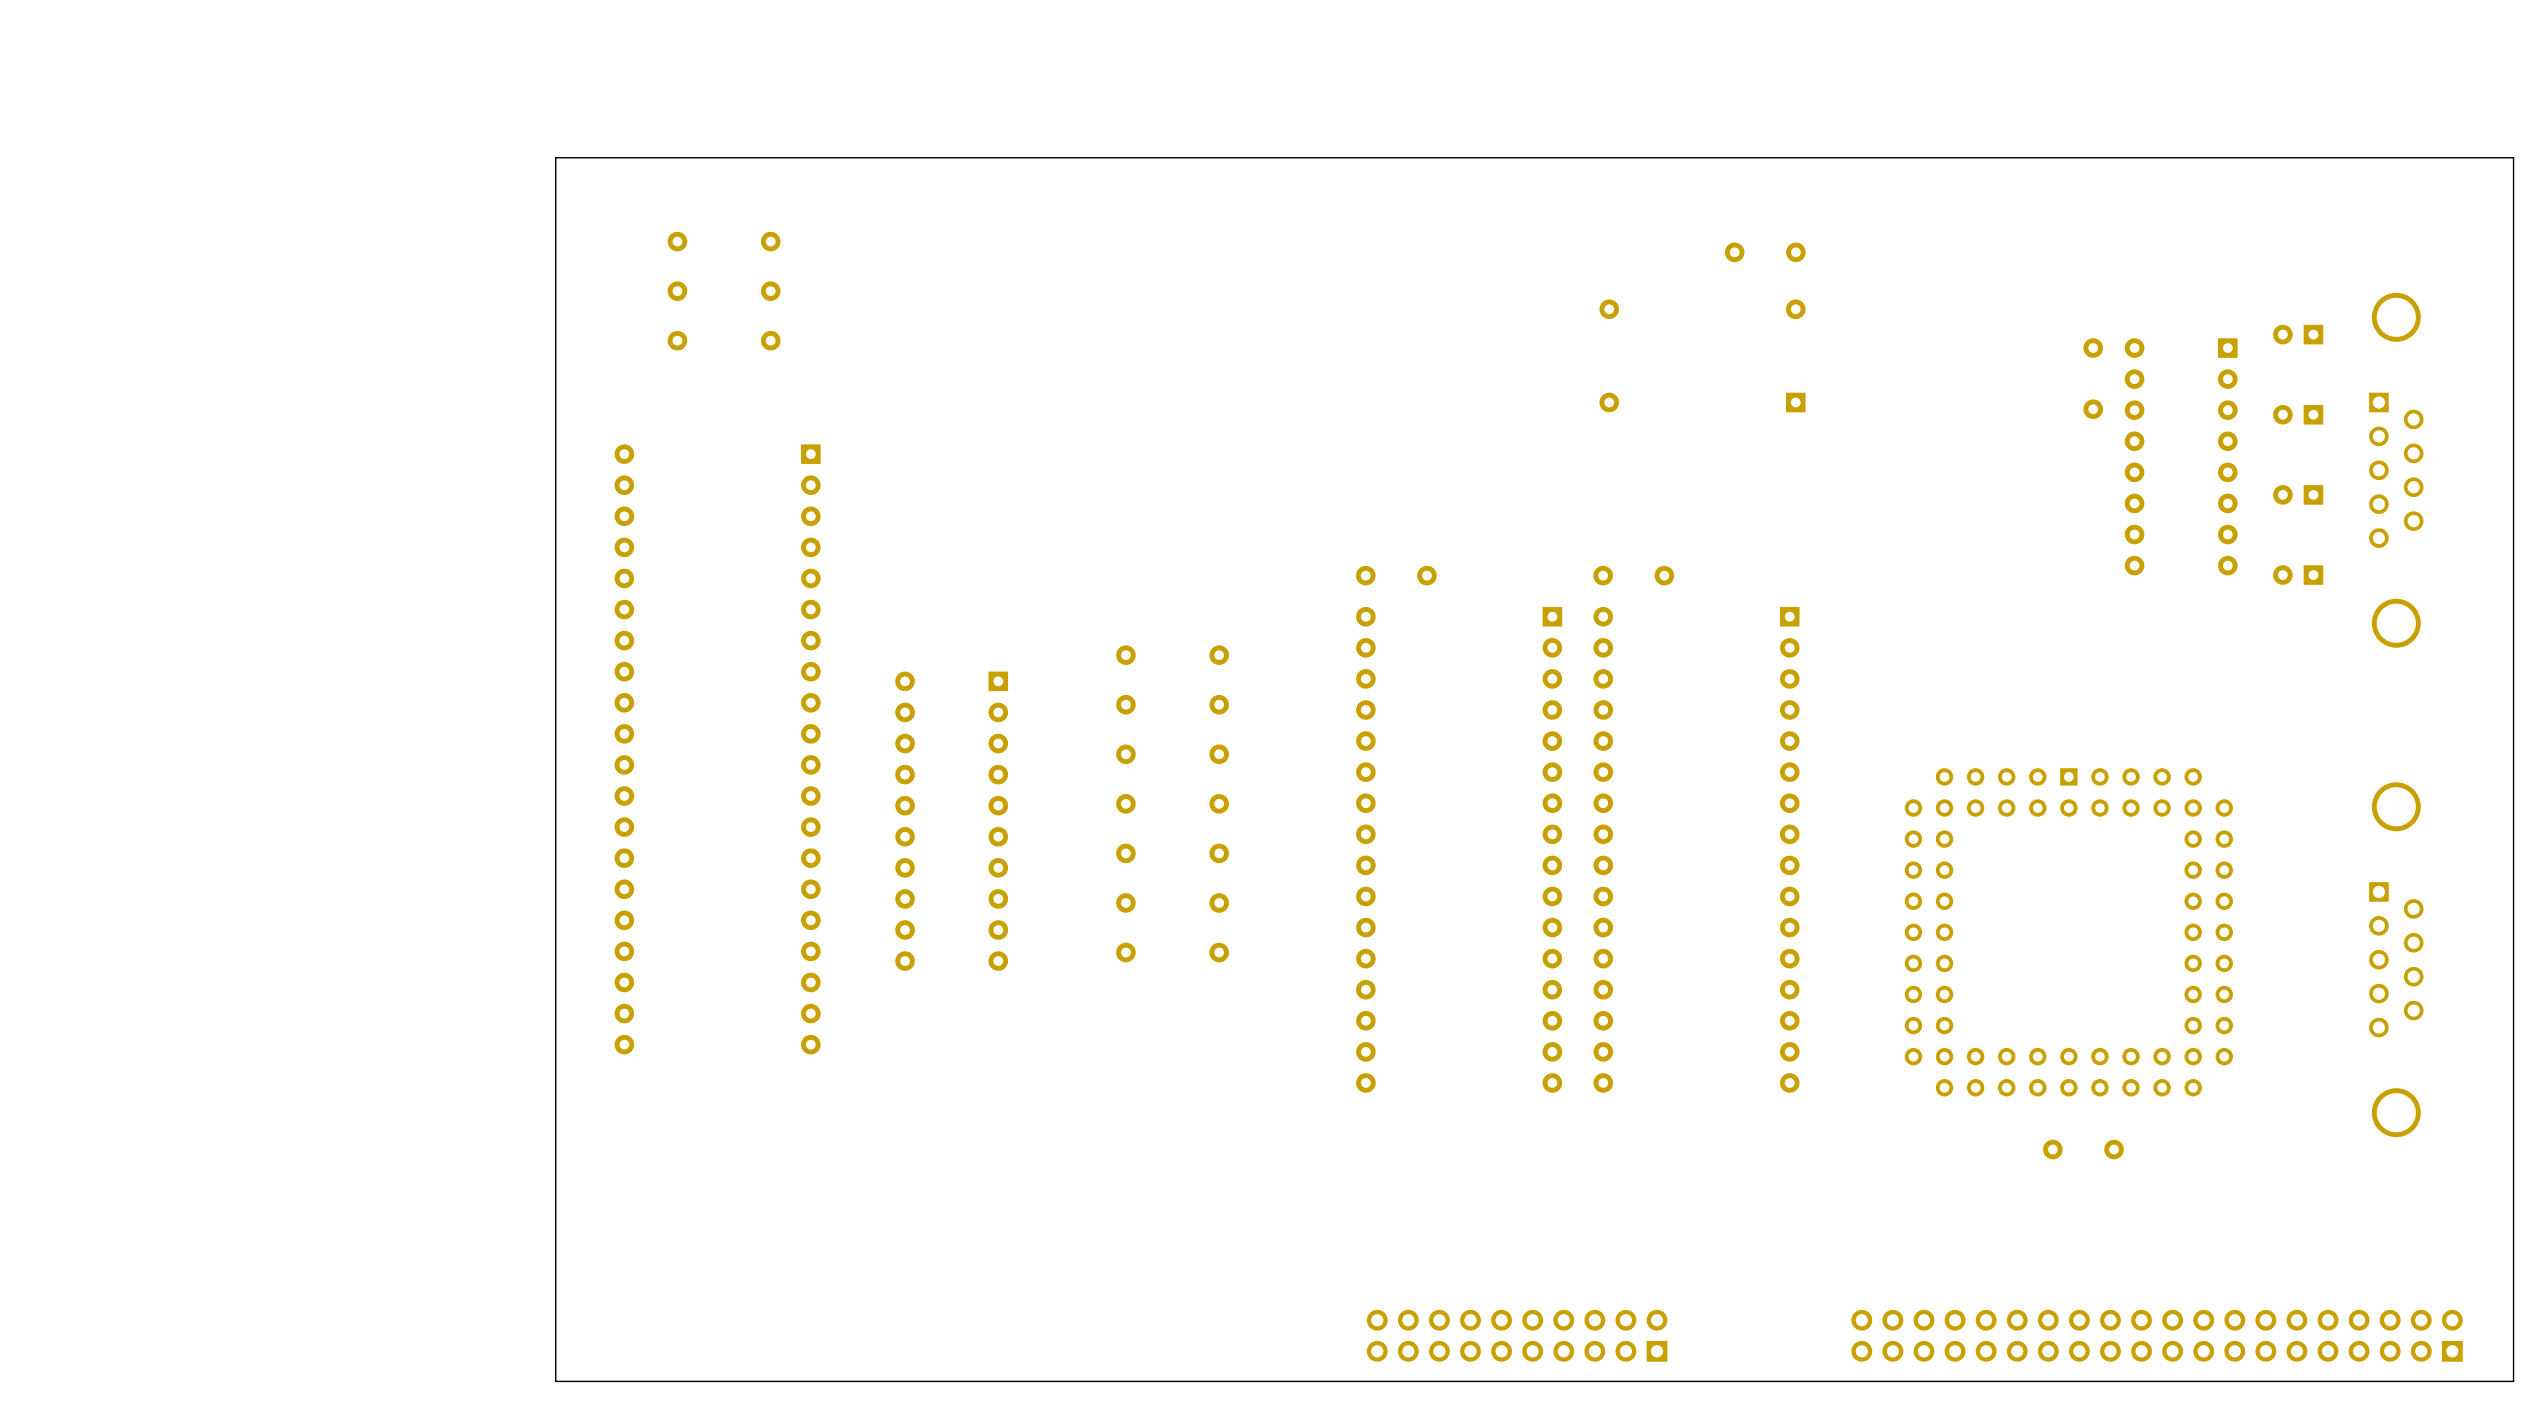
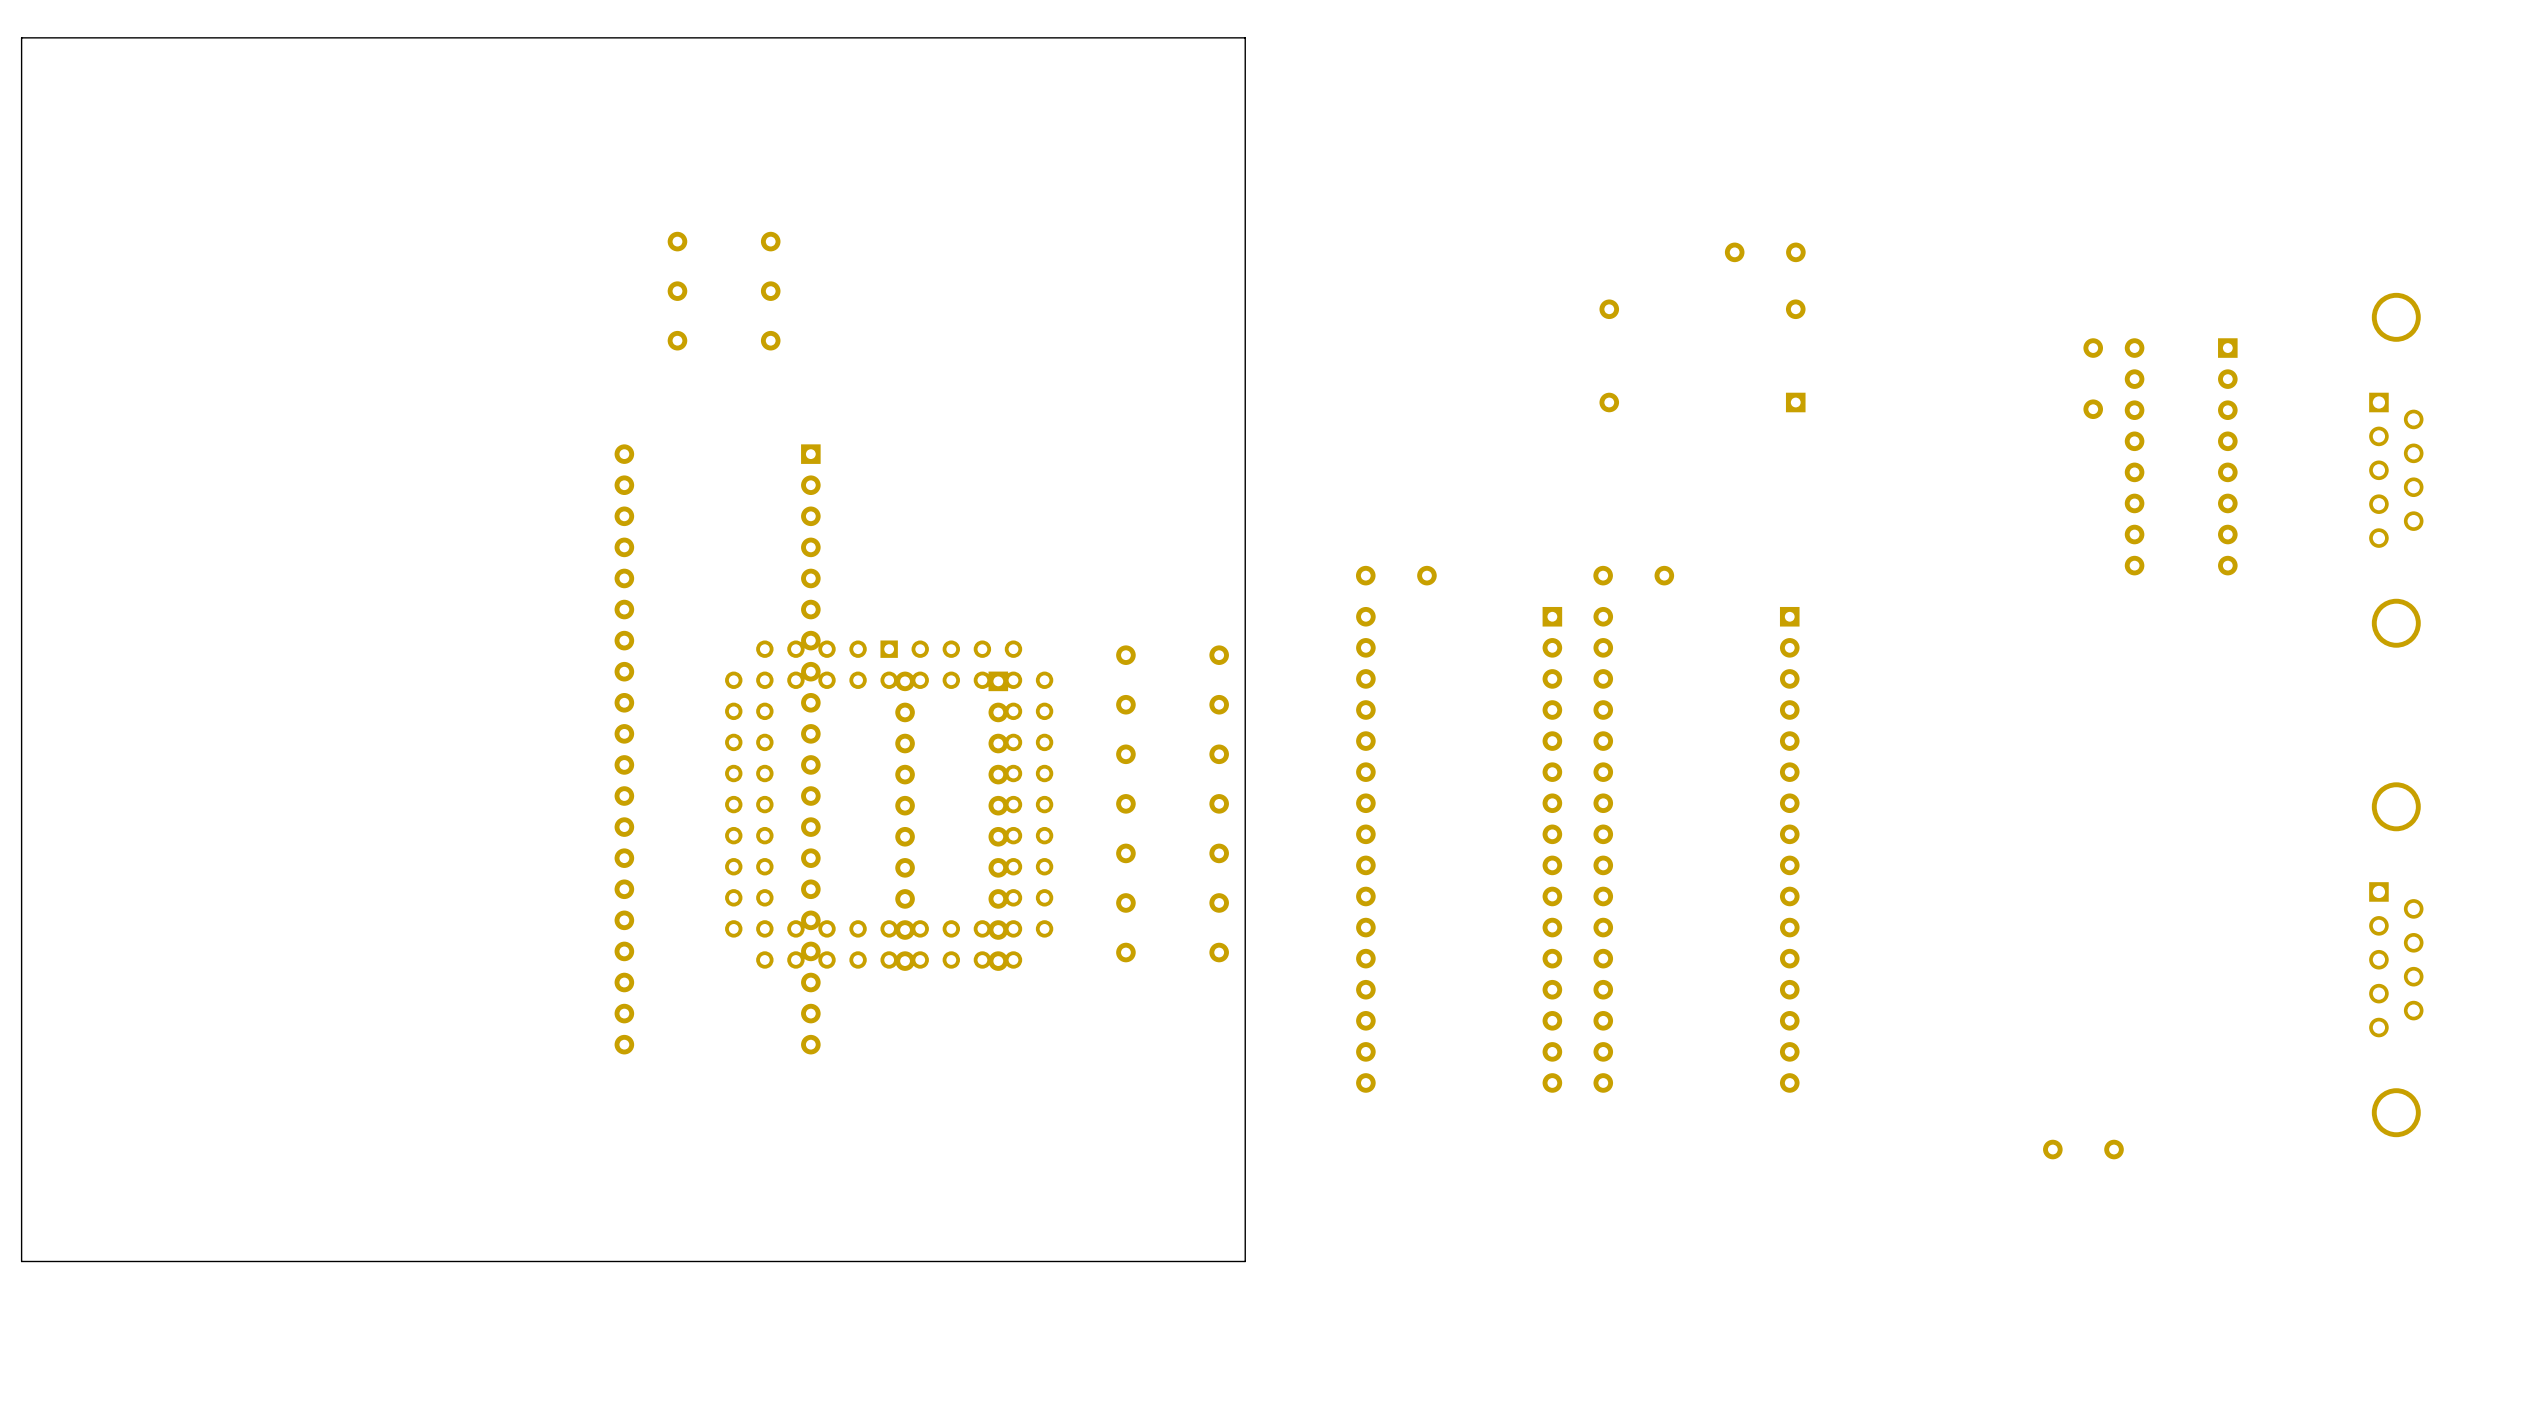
board edge: none -> (1245, 37) (21, 37) (21, 1261) (1245, 1261) (1245, 37)
board edge: (2513, 157) (555, 157) (555, 1381) (2513, 1381) (2513, 157) -> none
part: (2298, 334) -> none
part: (2298, 414) -> none
part: (2298, 494) -> none
part: (2298, 575) -> none
part: none -> (889, 804)
part: (2068, 932) -> none
part: (1517, 1335) -> none
part: (2157, 1335) -> none

